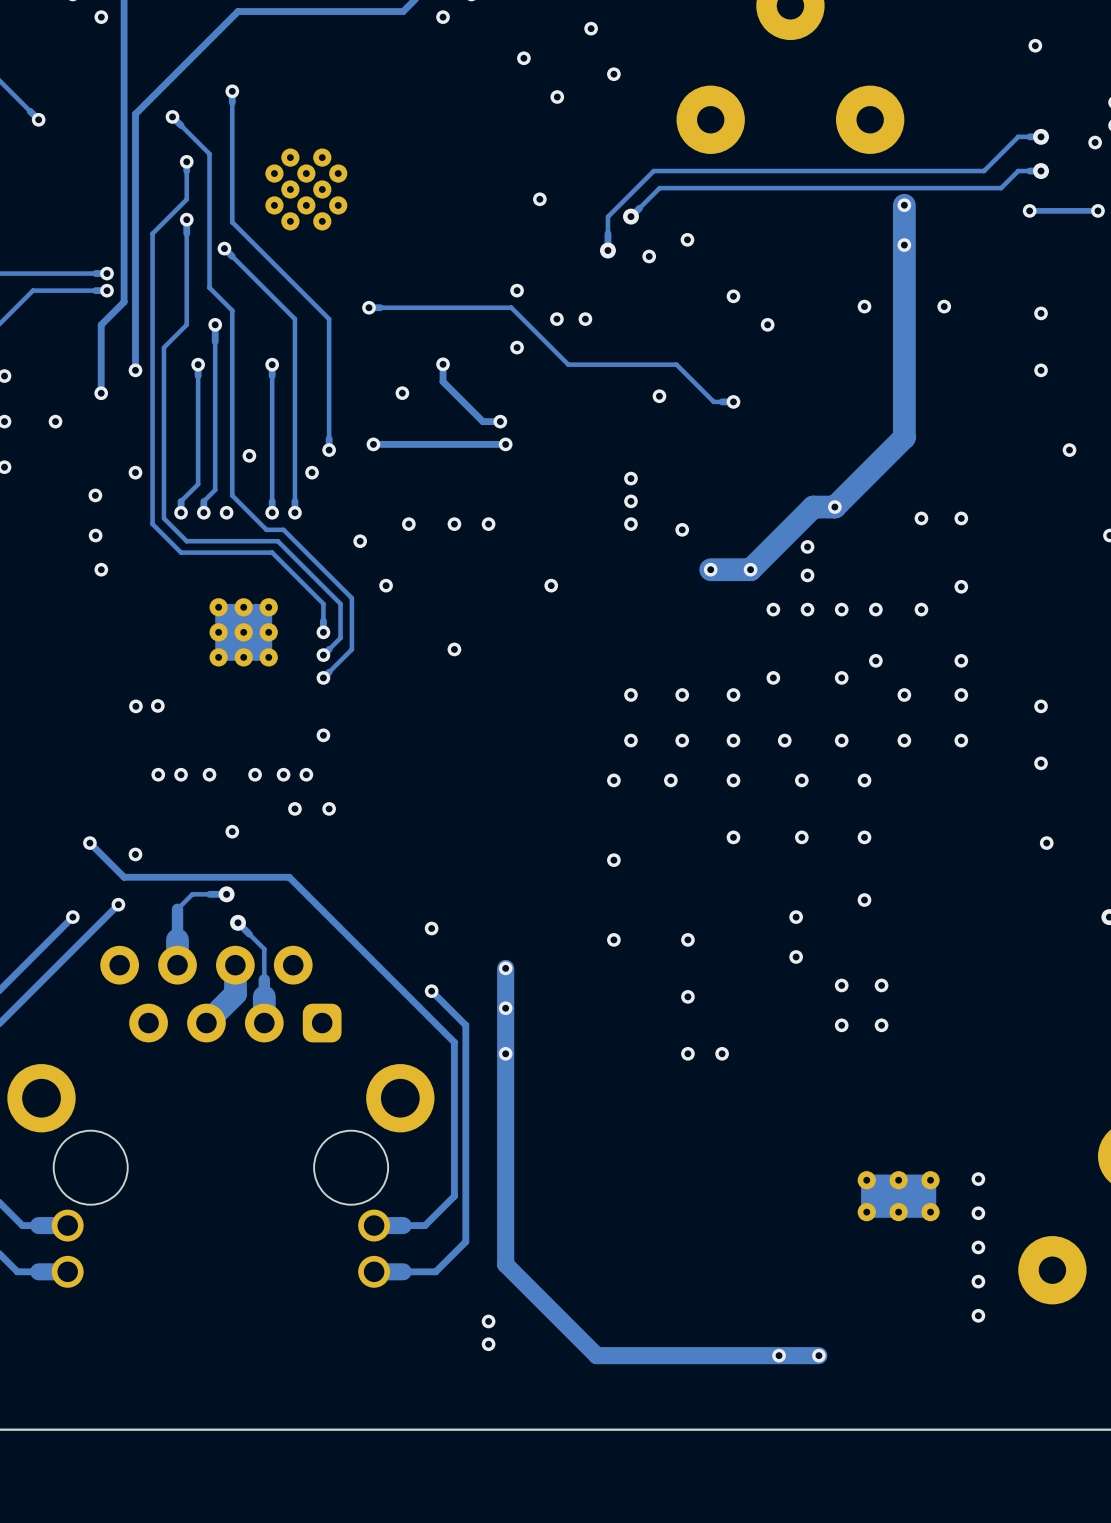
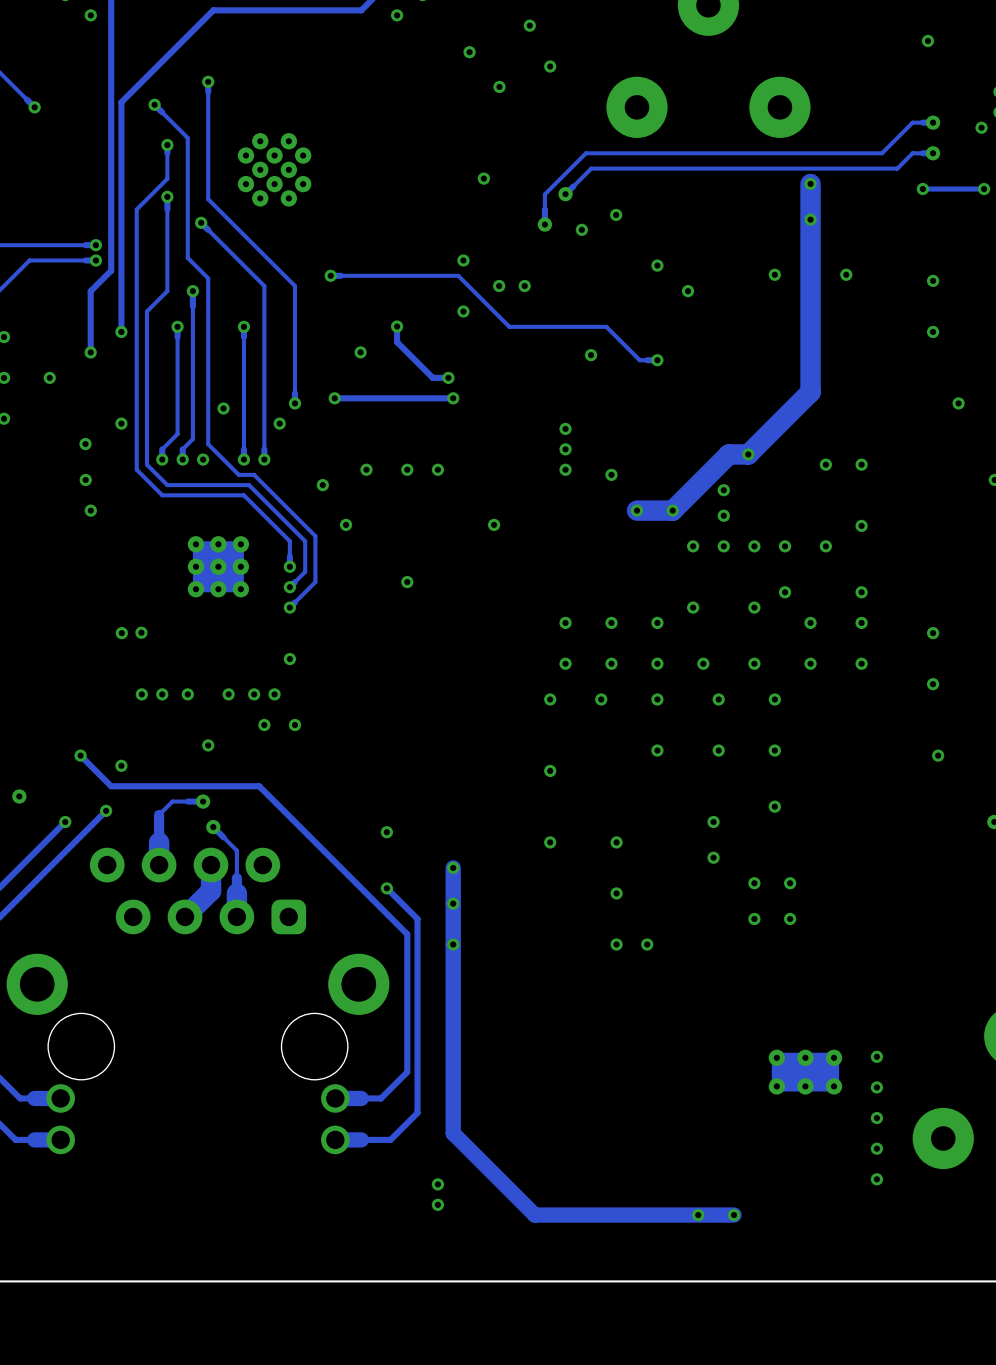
via: none -> (19, 796)

